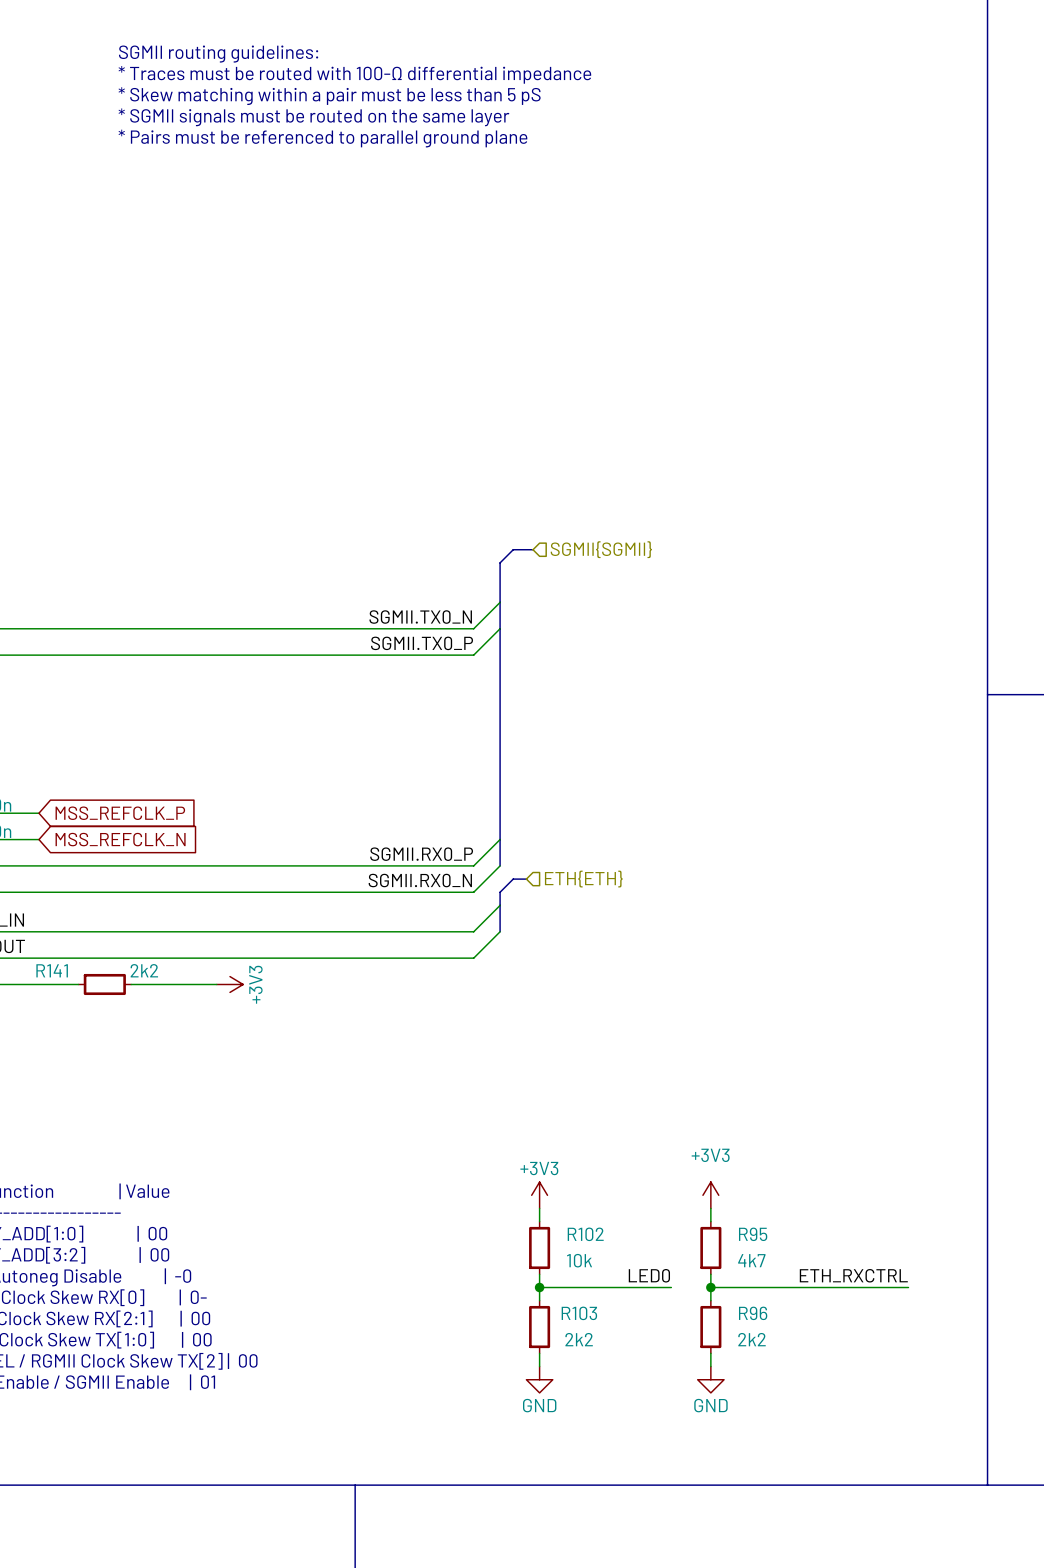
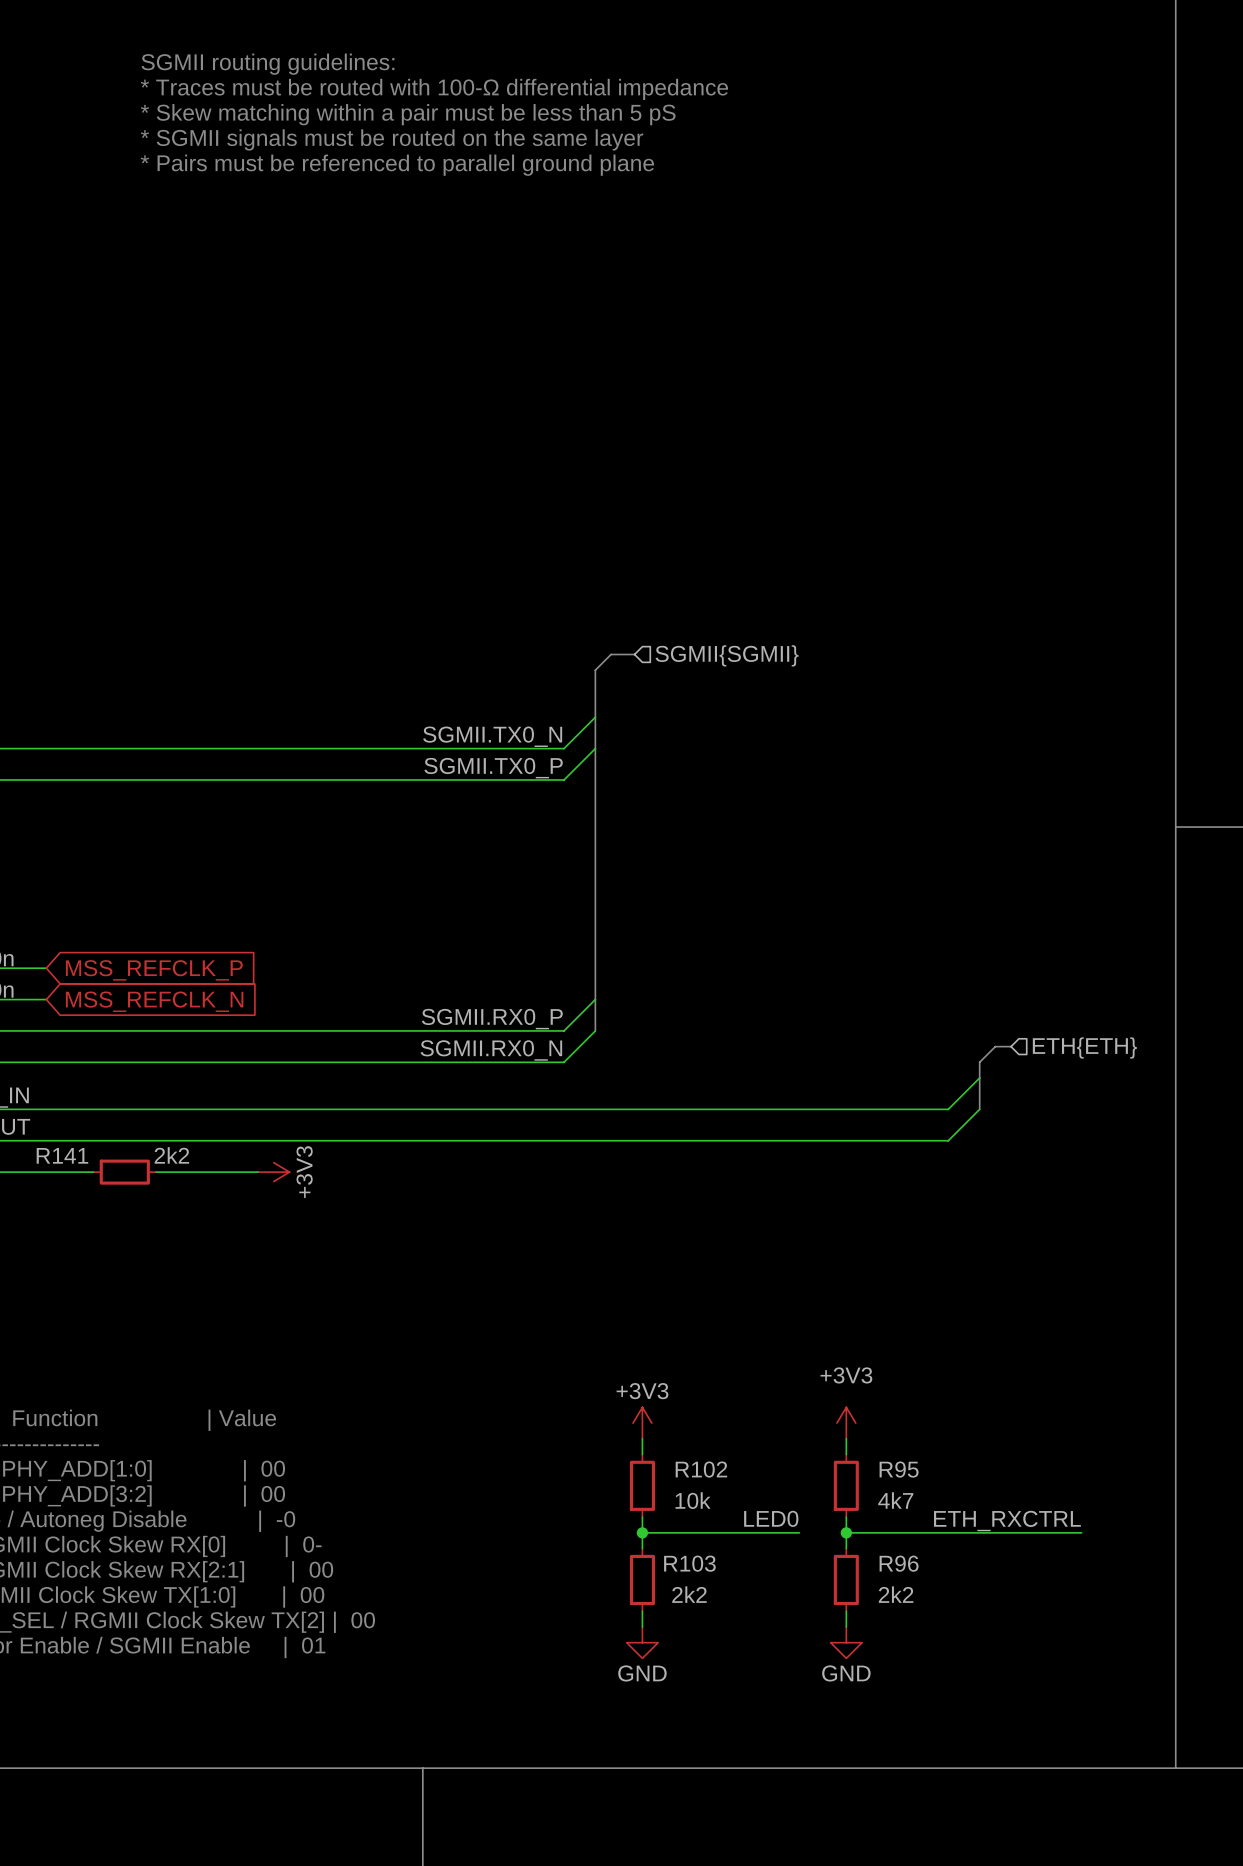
bus: (526, 879) (513, 879) (500, 892) (500, 931) -> none
hierarchical label: ETH{ETH} (583, 879) -> none
bus: none -> (1011, 1046) (995, 1046) (979, 1062) (979, 1109)
hierarchical label: none -> ETH{ETH} (1084, 1047)
wire: (500, 905) (473, 931) -> (979, 1078) (948, 1109) (564, 1109)
wire: (500, 931) (473, 958) -> (979, 1109) (948, 1140) (564, 1140)

